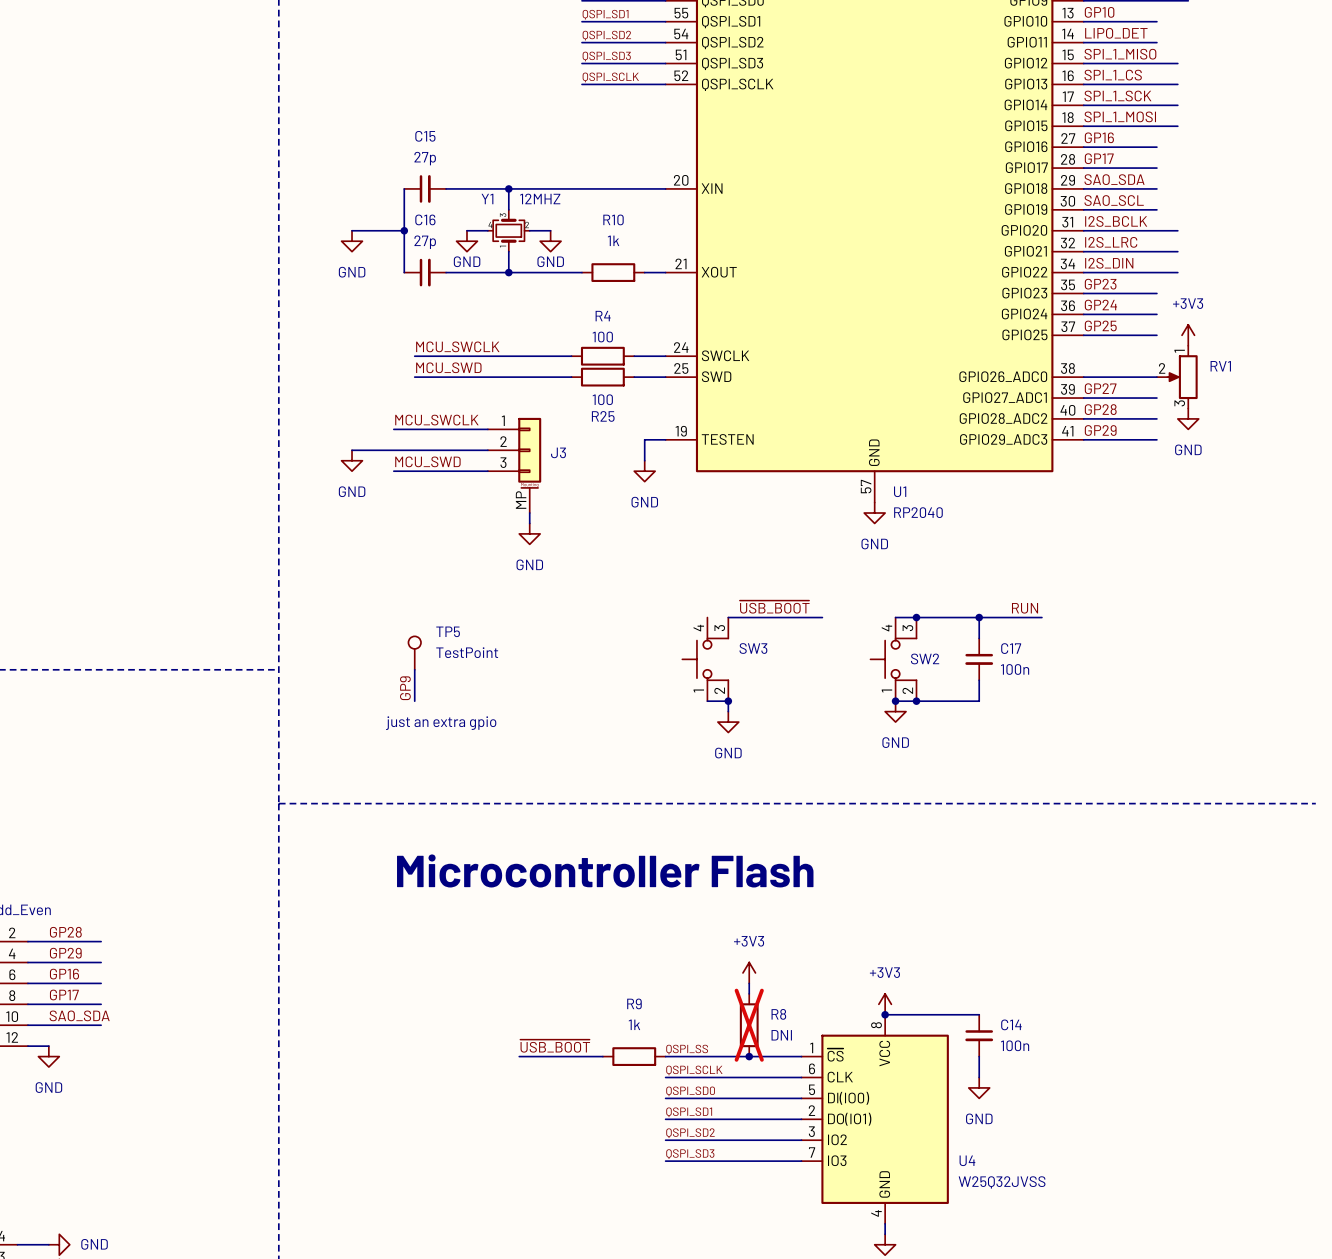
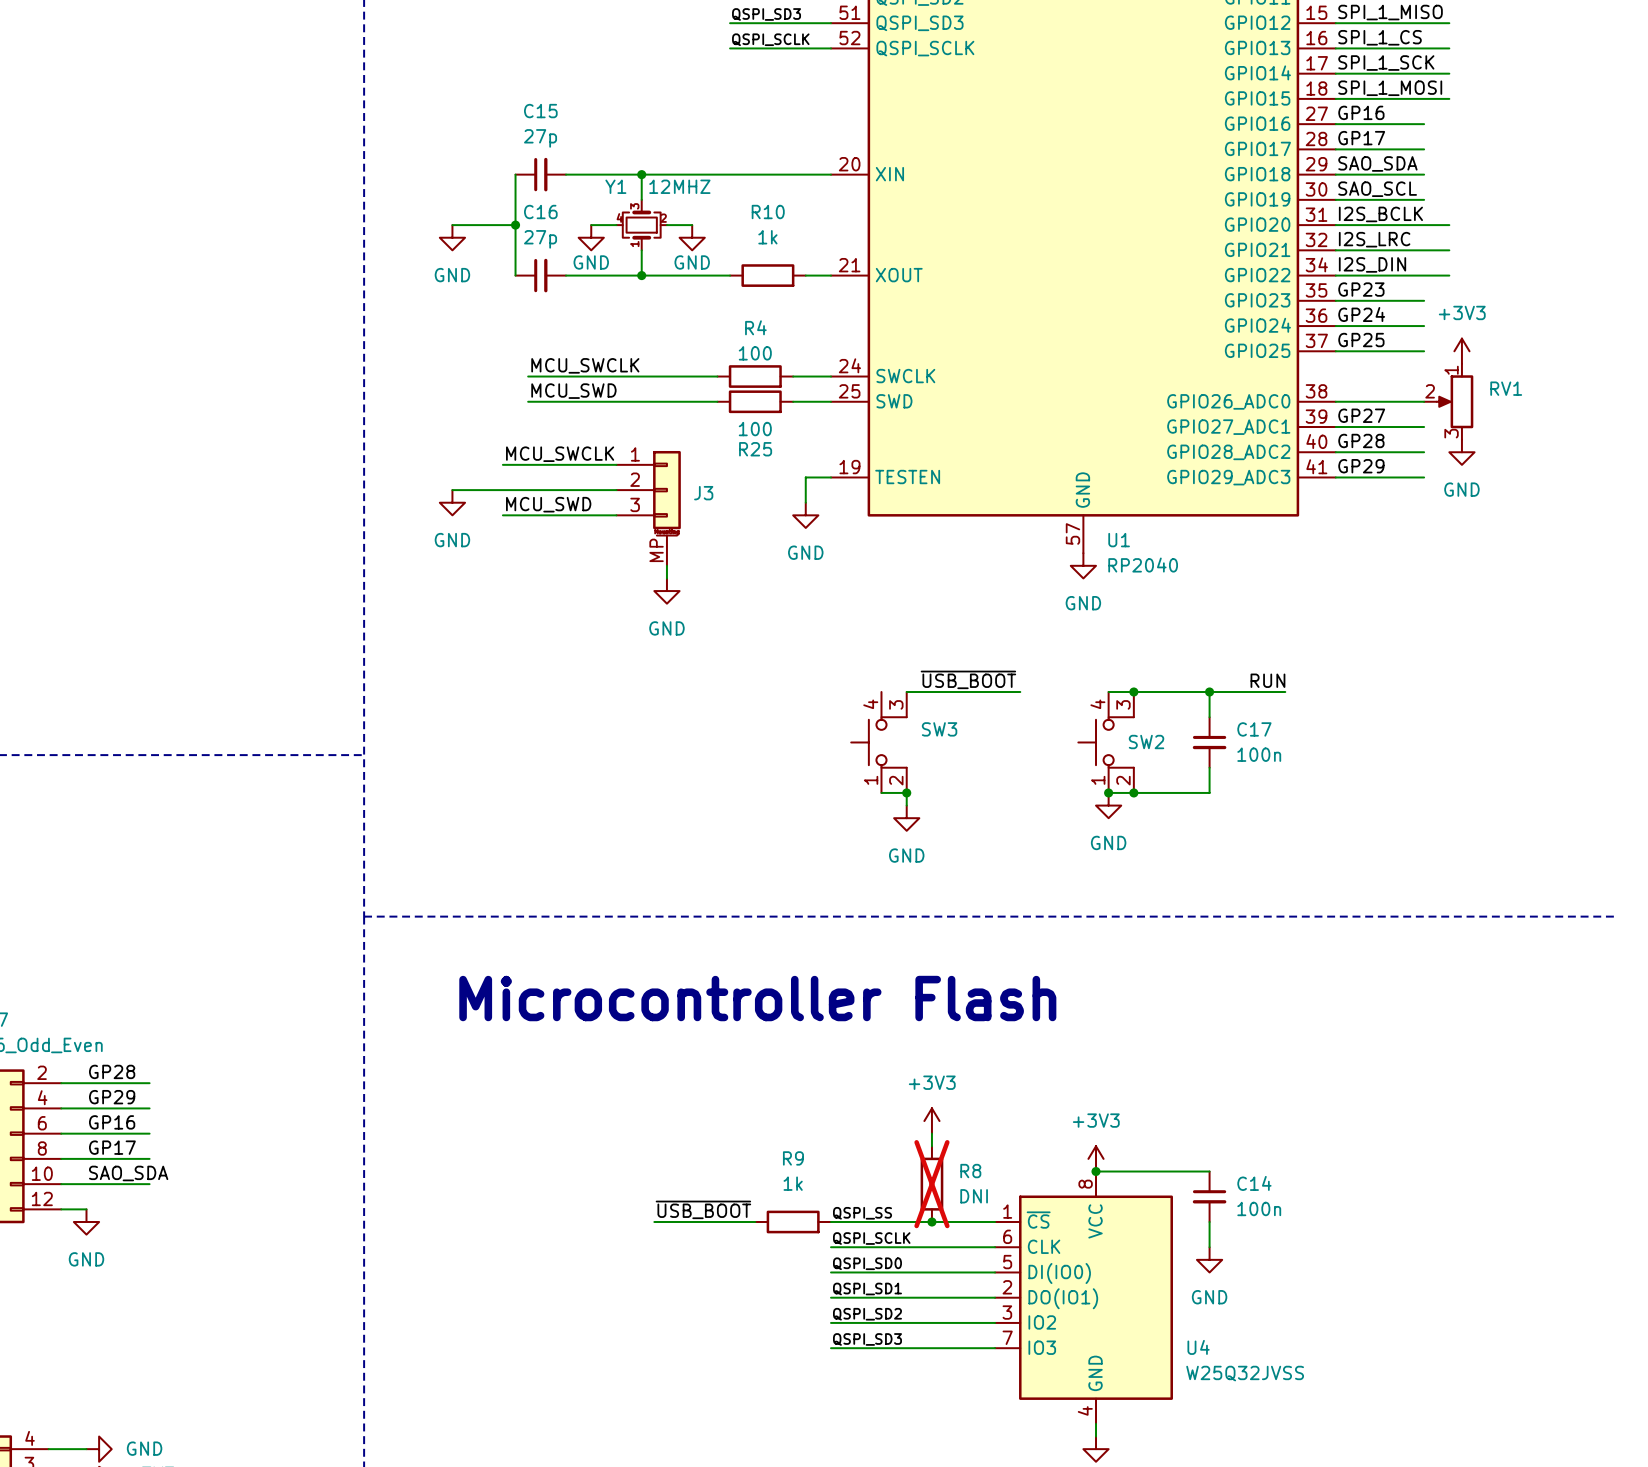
TP5: TestPoint (414, 653) -> none
wire: (414, 669) (414, 701) -> none
label: GP9 (405, 688) -> none
text: just an extra gpio (441, 723) -> none

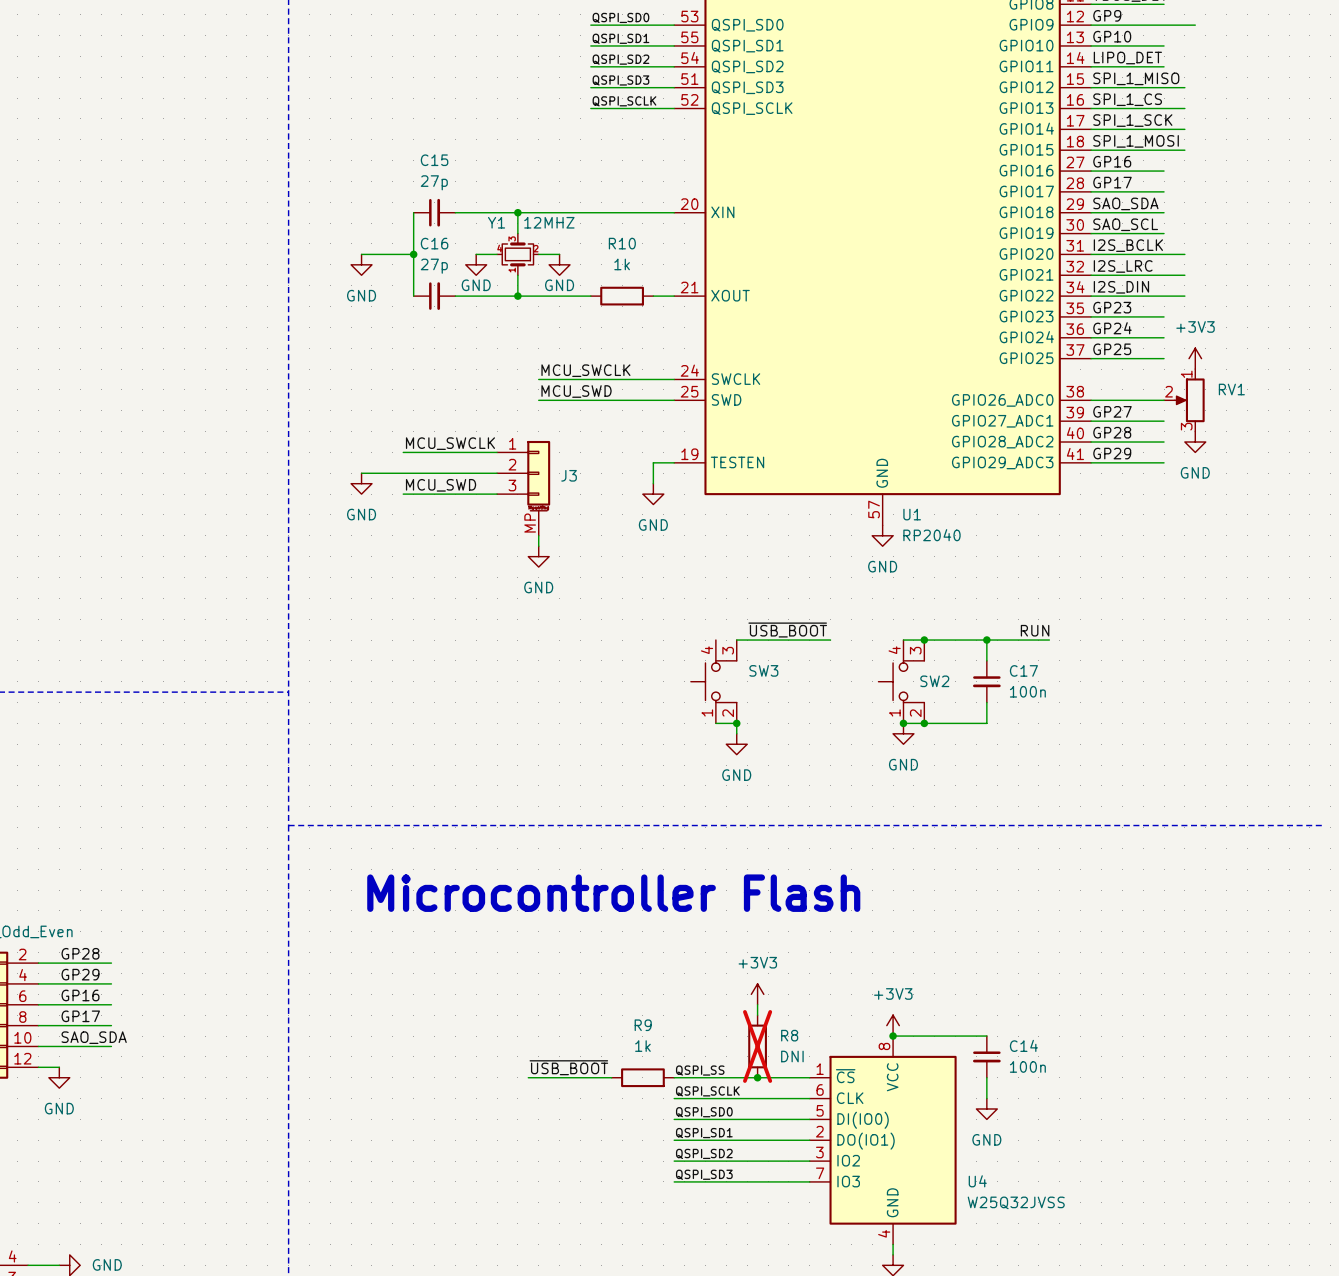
label position: MCU_SWCLK (585, 365) -> MCU_SWCLK (585, 370)
wire: (528, 376) (666, 376) -> none
wire: none -> (580, 379) (642, 379)
R4: 100 (755, 376) -> none
label position: MCU_SWD (573, 391) -> MCU_SWD (576, 391)
wire: (528, 401) (666, 401) -> none
wire: none -> (580, 400) (642, 400)
R25: 100 (755, 401) -> none

